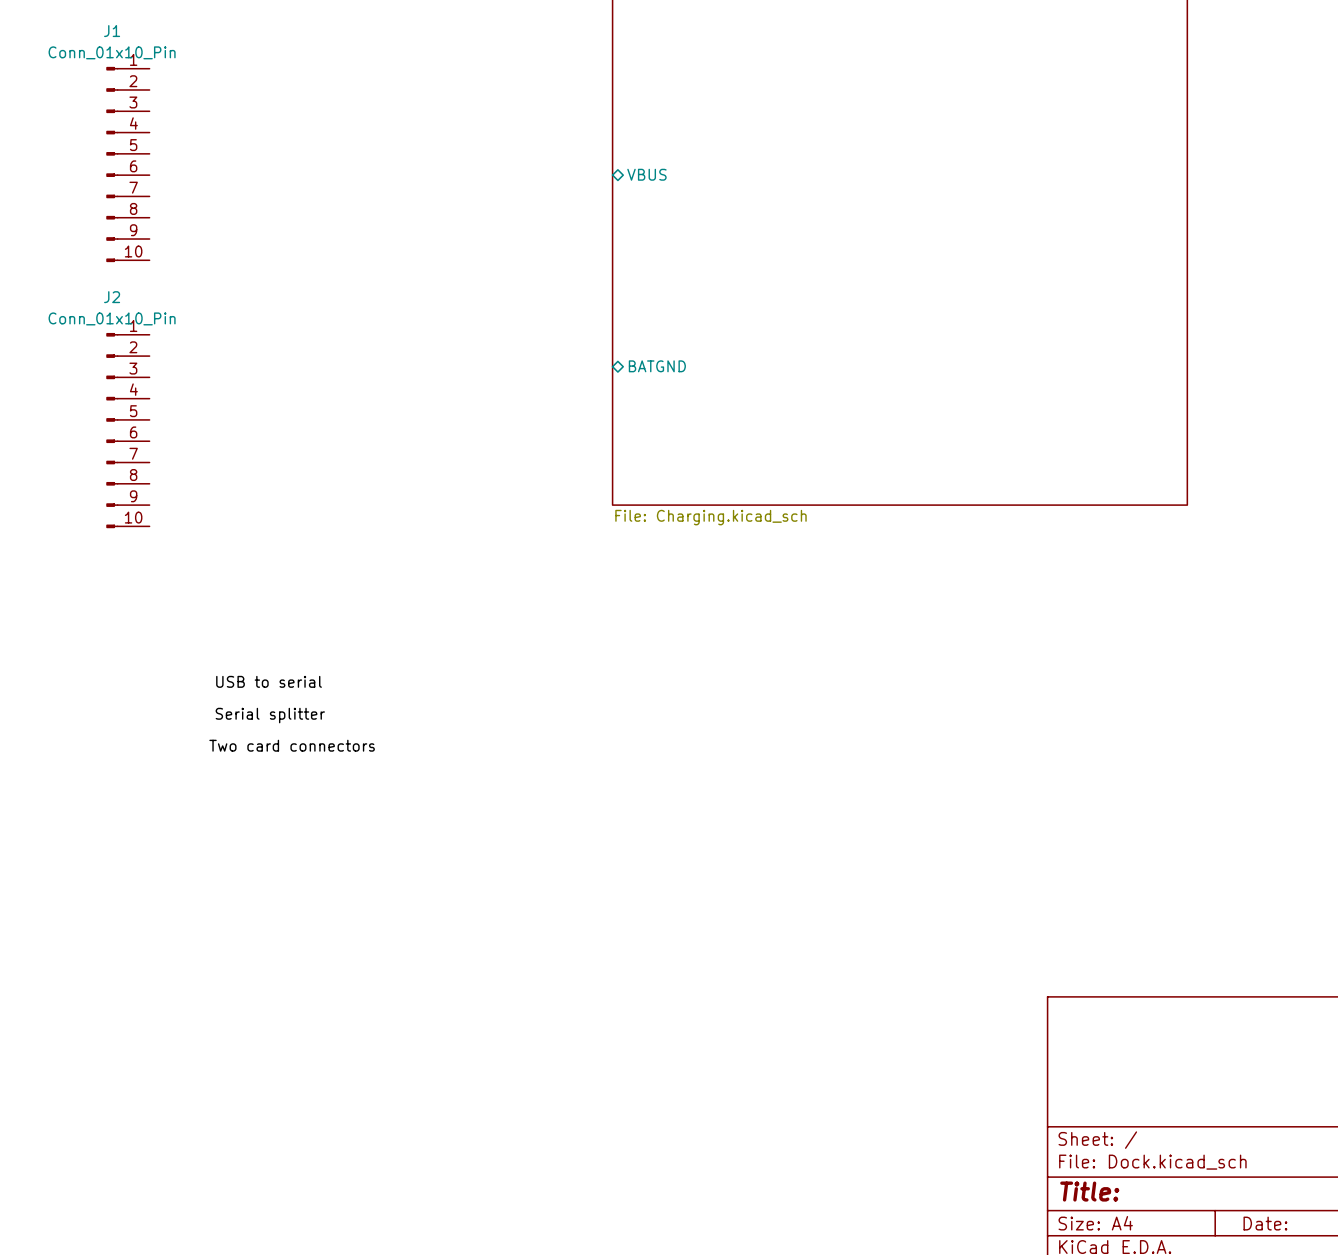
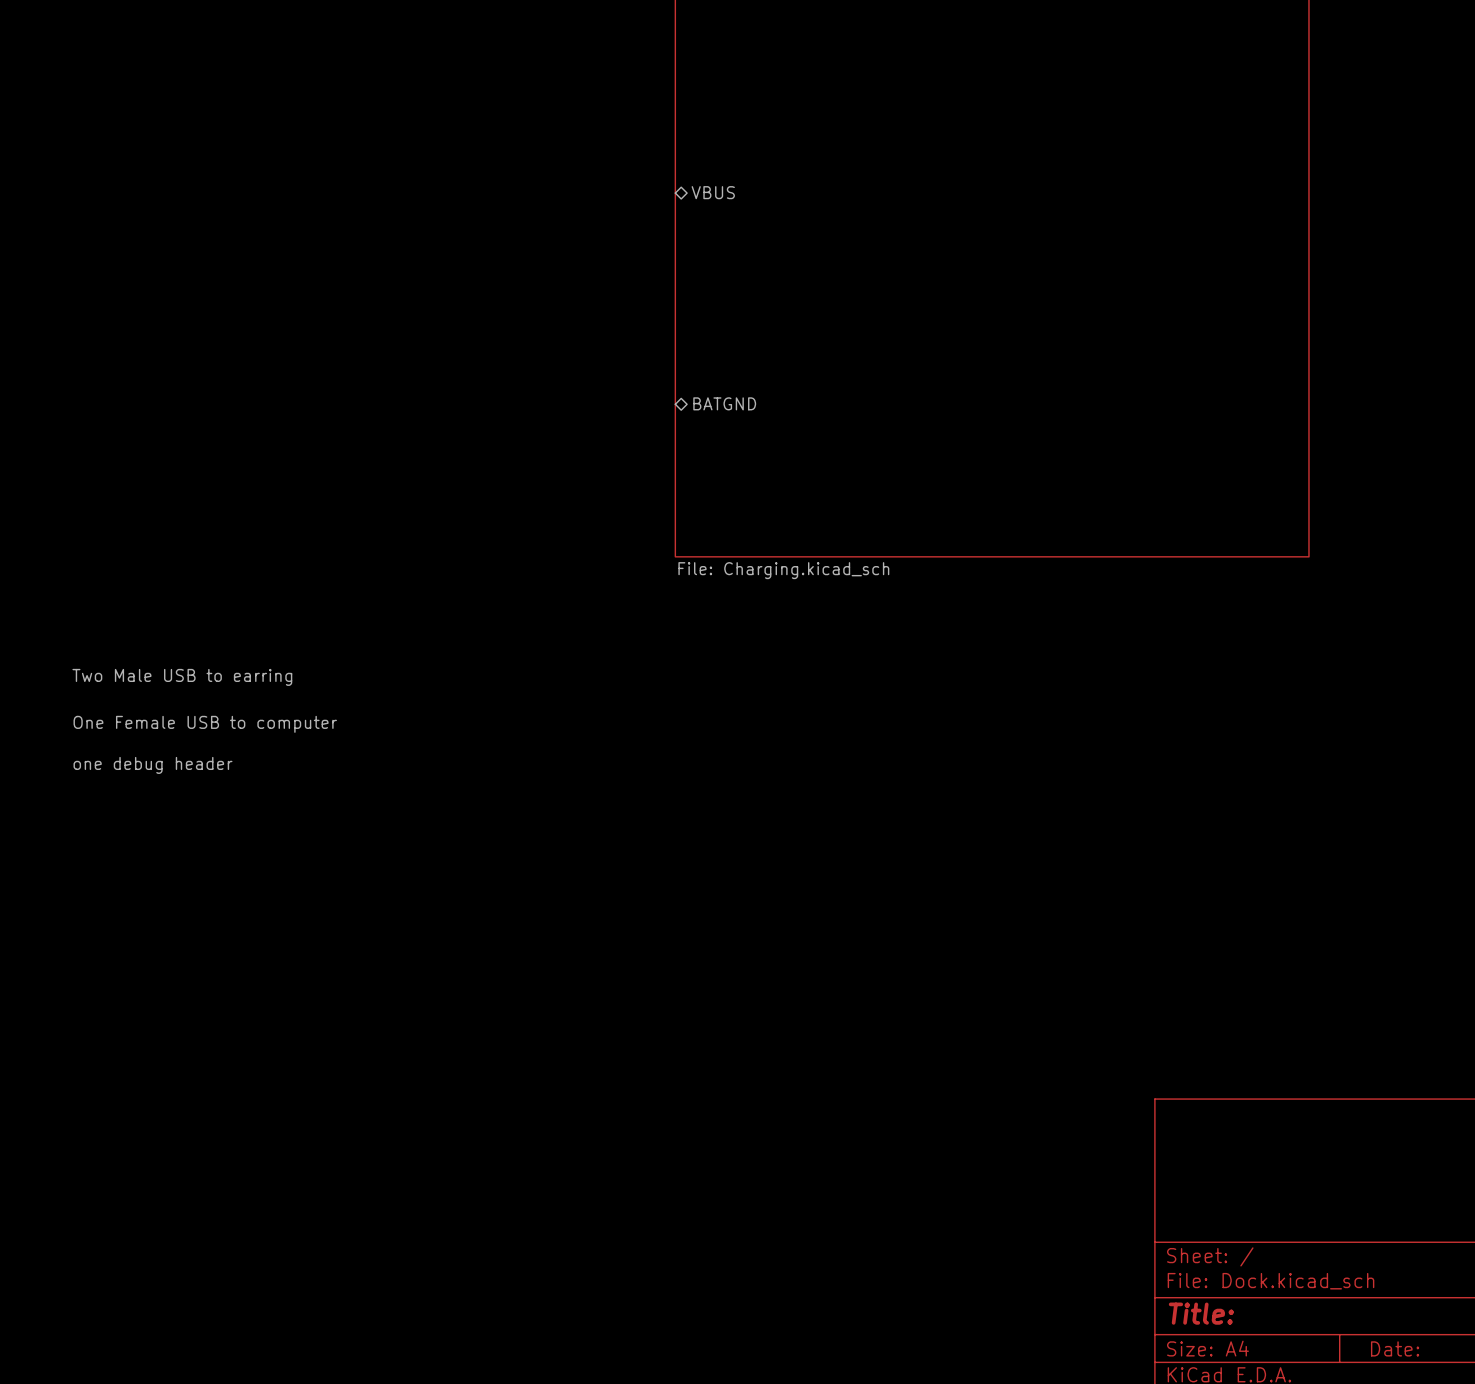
J1: Conn_01x10_Pin (127, 164) -> none
J2: Conn_01x10_Pin (127, 430) -> none
label: none -> Two Male USB to earring (182, 677)
label: none -> One Female USB to computer (205, 724)
label: USB to serial (269, 681) -> none
label: none -> one debug header (152, 765)
label: Serial splitter (270, 715) -> none
label: Two card connectors (292, 745) -> none

